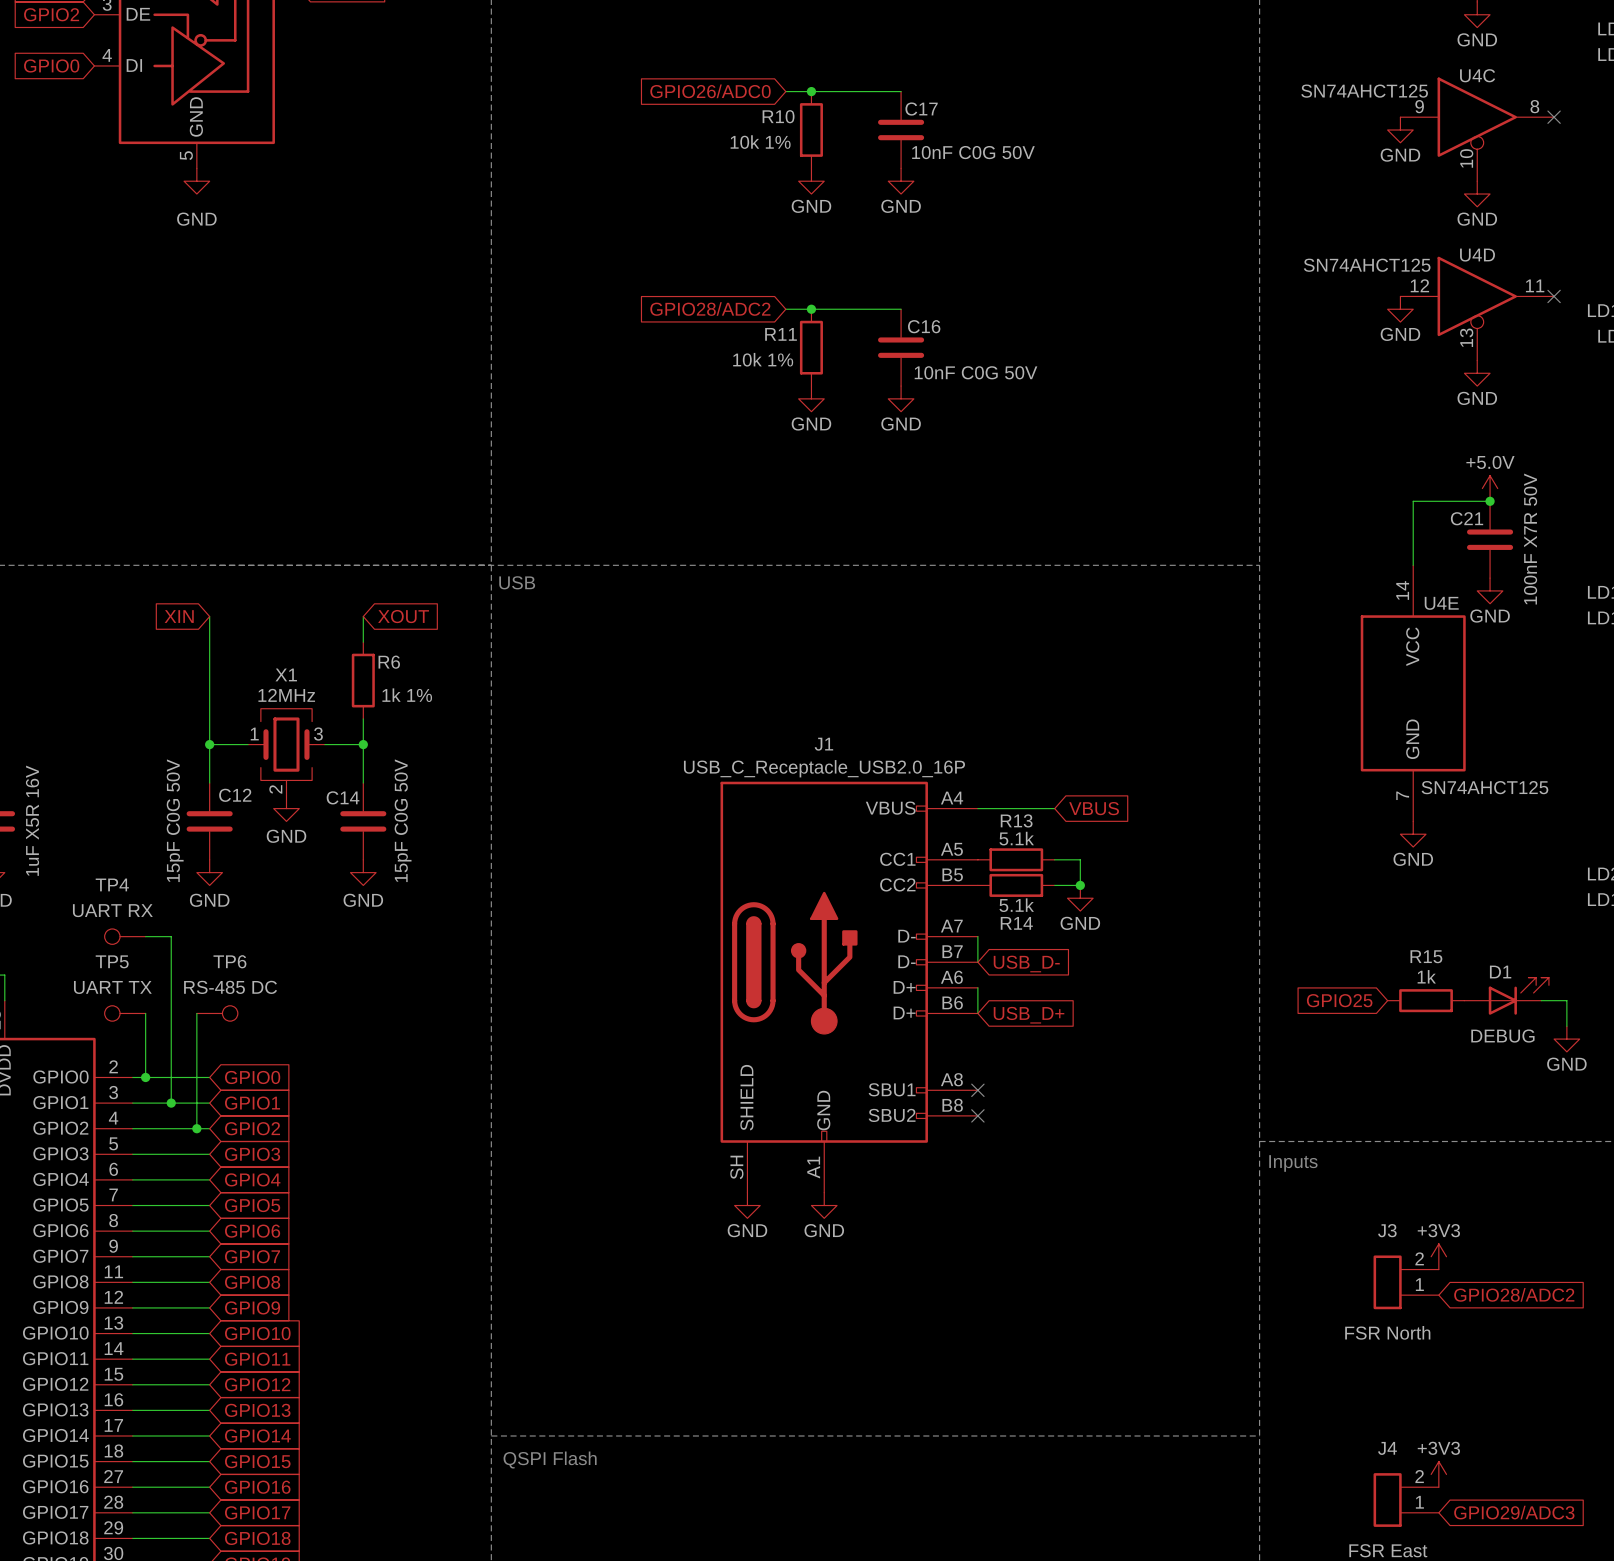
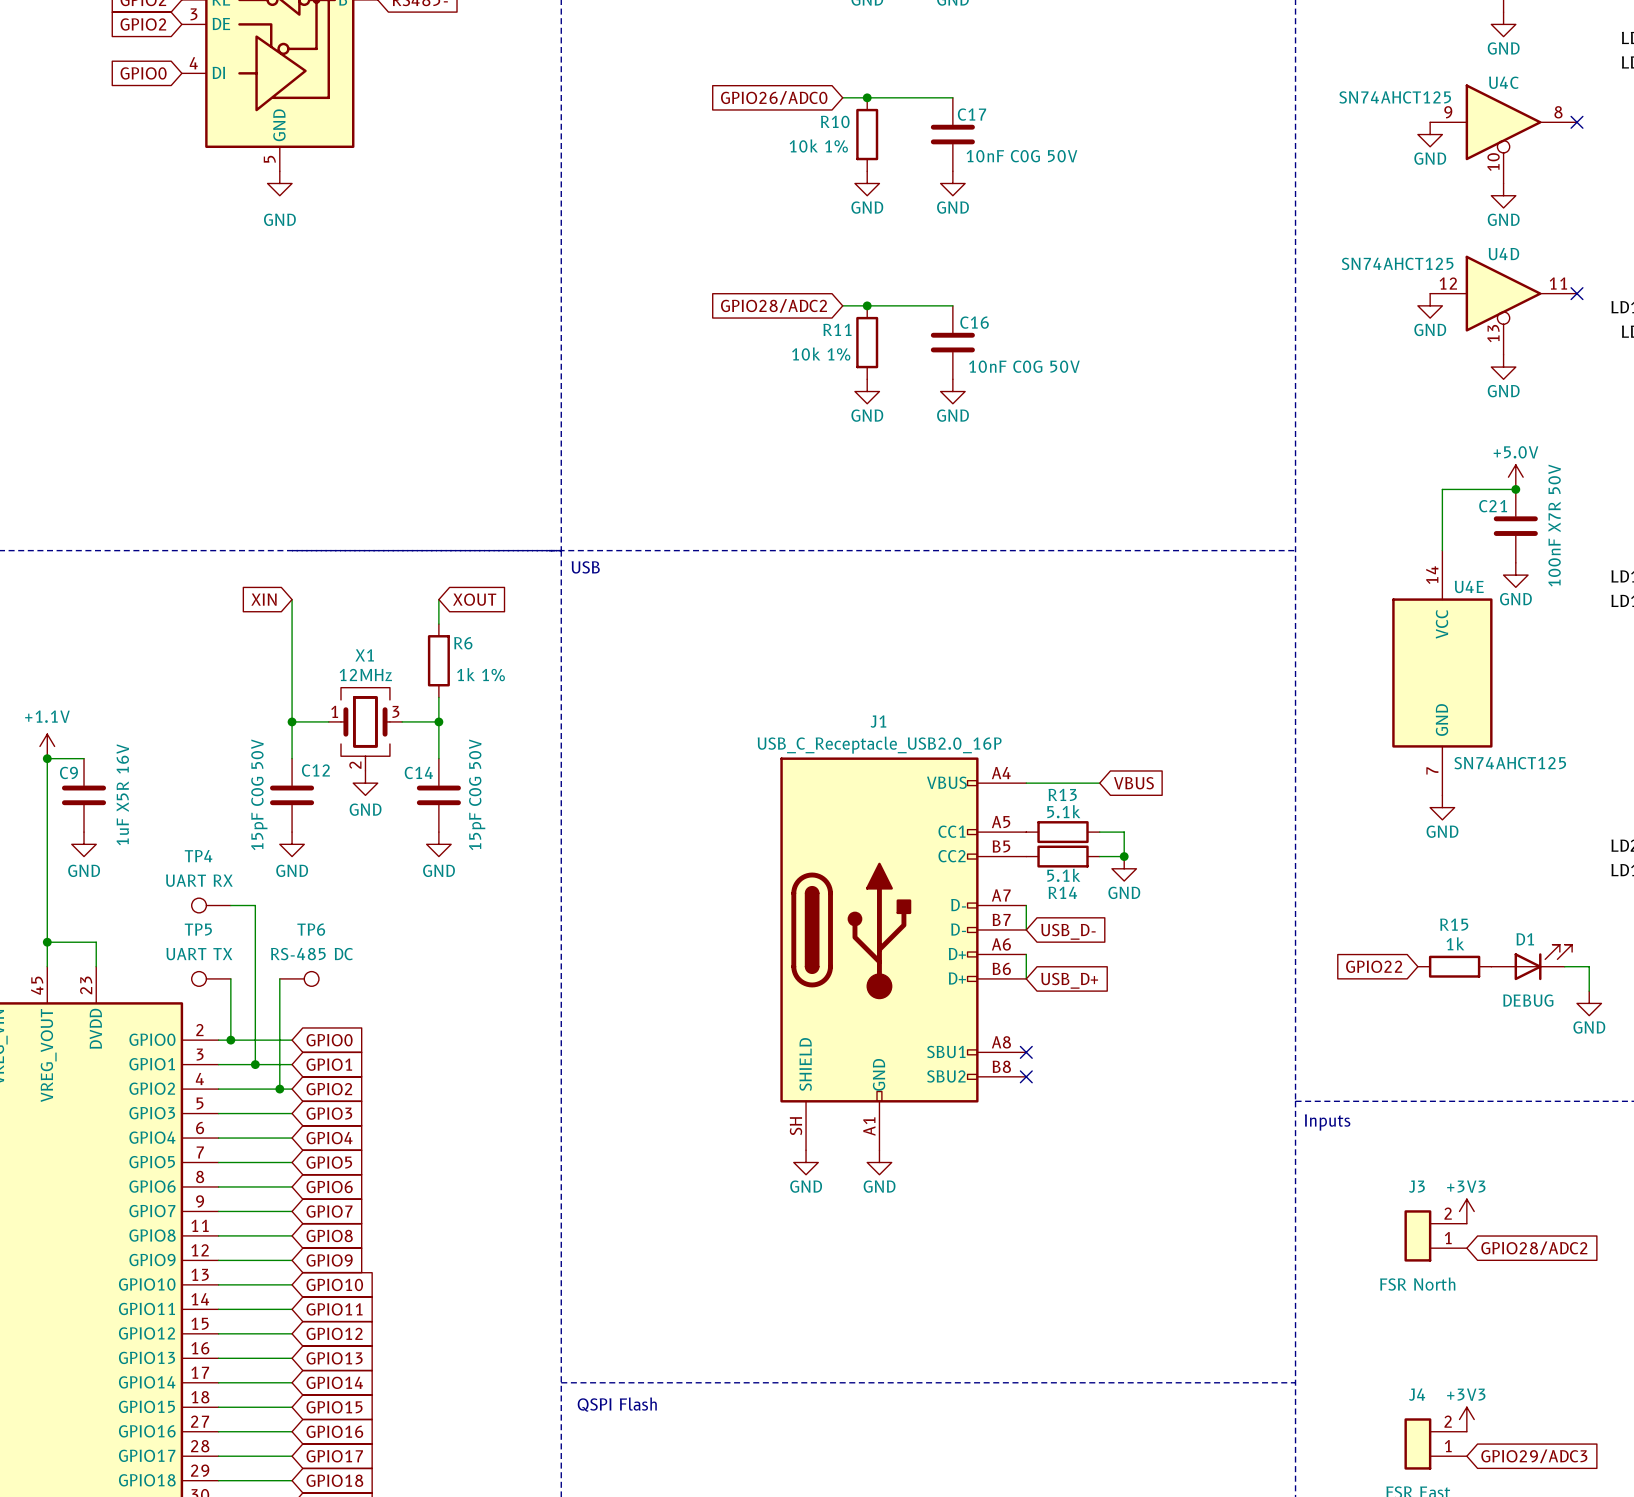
global label: GPIO25 (1339, 1000) -> GPIO22 (1374, 966)

